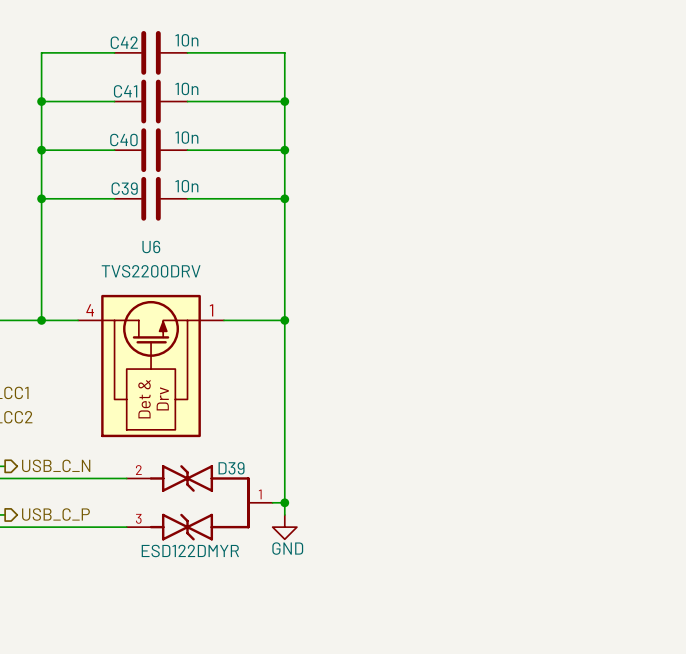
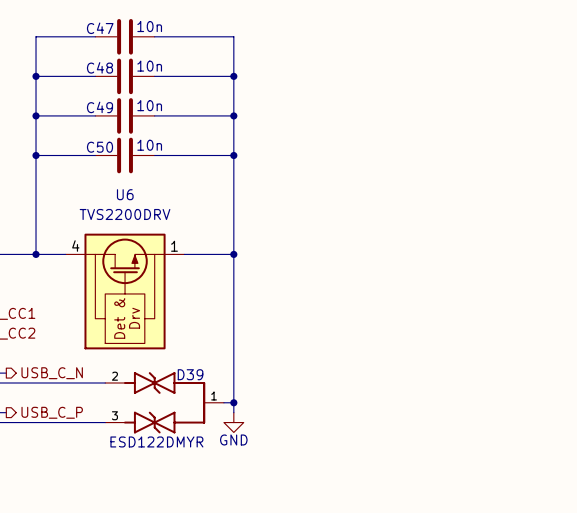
C42 name: C42 (124, 42) -> C47 (100, 28)
C41 name: C41 (125, 91) -> C48 (99, 67)
C40 name: C40 (123, 139) -> C49 (99, 107)
C39 name: C39 (124, 188) -> C50 (99, 147)

